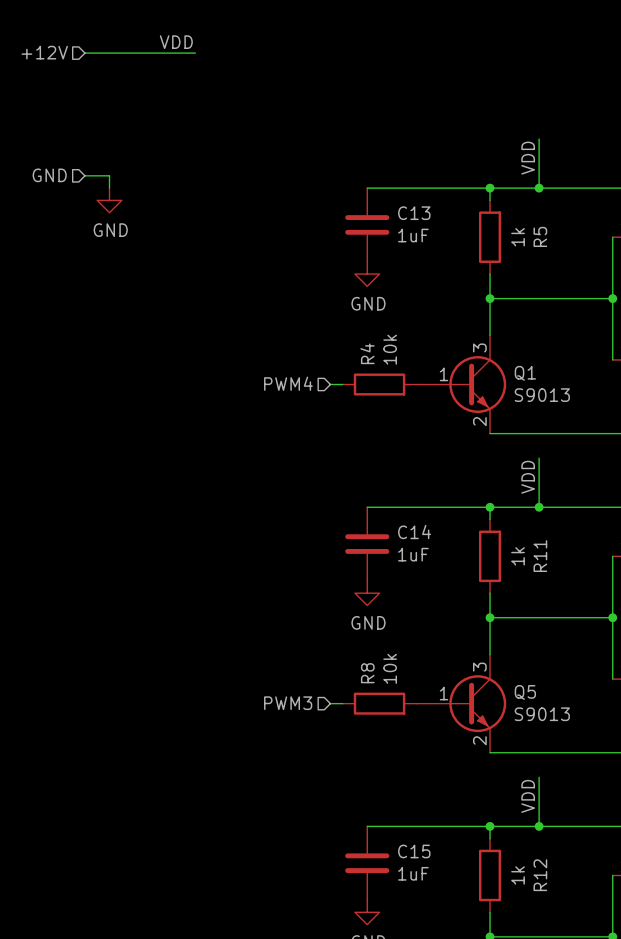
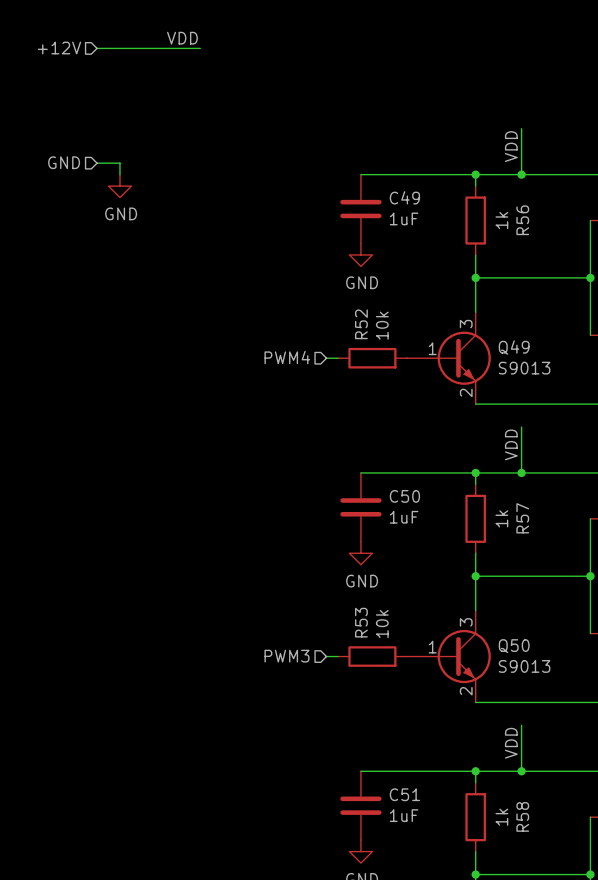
C13 name: C13 (414, 213) -> C49 (404, 197)
R5 name: R5 (540, 236) -> R56 (522, 220)
R4 name: R4 (367, 353) -> R52 (361, 324)
Q1 name: Q1 (525, 373) -> Q49 (514, 347)
C14 name: C14 (414, 532) -> C50 (404, 496)
R11 name: R11 (540, 556) -> R57 (522, 518)
R8 name: R8 (367, 673) -> R53 (361, 622)
Q5 name: Q5 (525, 692) -> Q50 (514, 646)
C15 name: C15 (414, 851) -> C51 (404, 794)
R12 name: R12 (540, 875) -> R58 (522, 816)

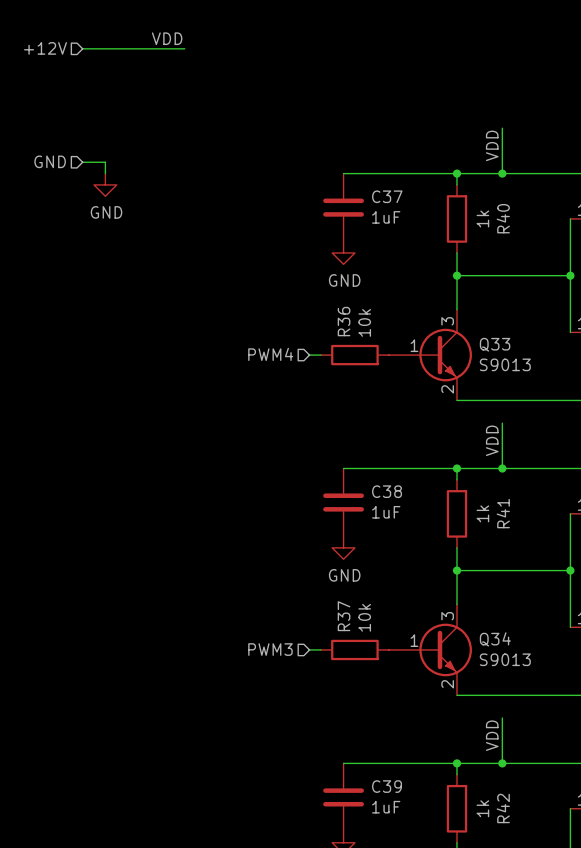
C49 name: C49 (404, 197) -> C37 (387, 196)
R56 name: R56 (522, 220) -> R40 (503, 218)
R52 name: R52 (361, 324) -> R36 (344, 321)
Q49 name: Q49 (514, 347) -> Q33 (495, 344)
C50 name: C50 (404, 496) -> C38 (387, 491)
R57 name: R57 (522, 518) -> R41 (503, 513)
R53 name: R53 (361, 622) -> R37 (344, 616)
Q50 name: Q50 (514, 646) -> Q34 (495, 639)
C51 name: C51 (404, 794) -> C39 (387, 786)
R58 name: R58 (522, 816) -> R42 (503, 808)

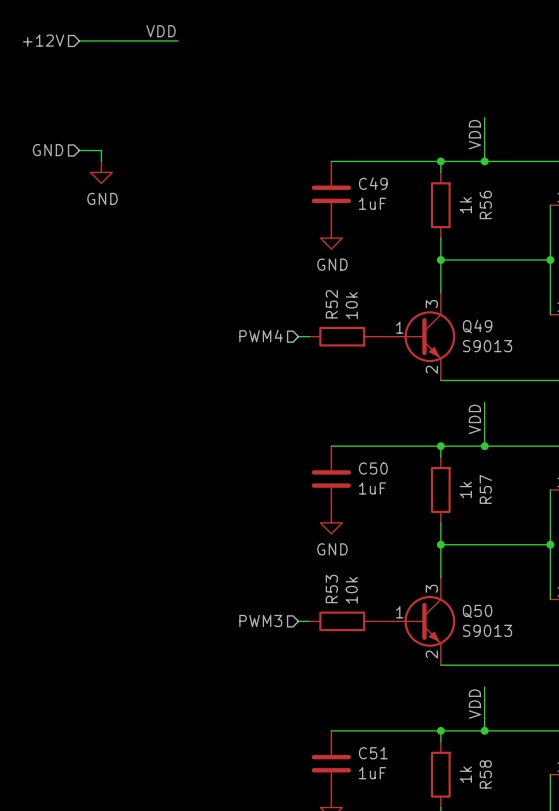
C37 name: C37 (387, 196) -> C49 (373, 183)
R40 name: R40 (503, 218) -> R56 (485, 204)
R36 name: R36 (344, 321) -> R52 (331, 304)
Q33 name: Q33 (495, 344) -> Q49 (477, 326)
C38 name: C38 (387, 491) -> C50 (373, 468)
R41 name: R41 (503, 513) -> R57 (485, 489)
R37 name: R37 (344, 616) -> R53 (331, 589)
Q34 name: Q34 (495, 639) -> Q50 (477, 611)
C39 name: C39 (387, 786) -> C51 (373, 753)
R42 name: R42 (503, 808) -> R58 (485, 774)

